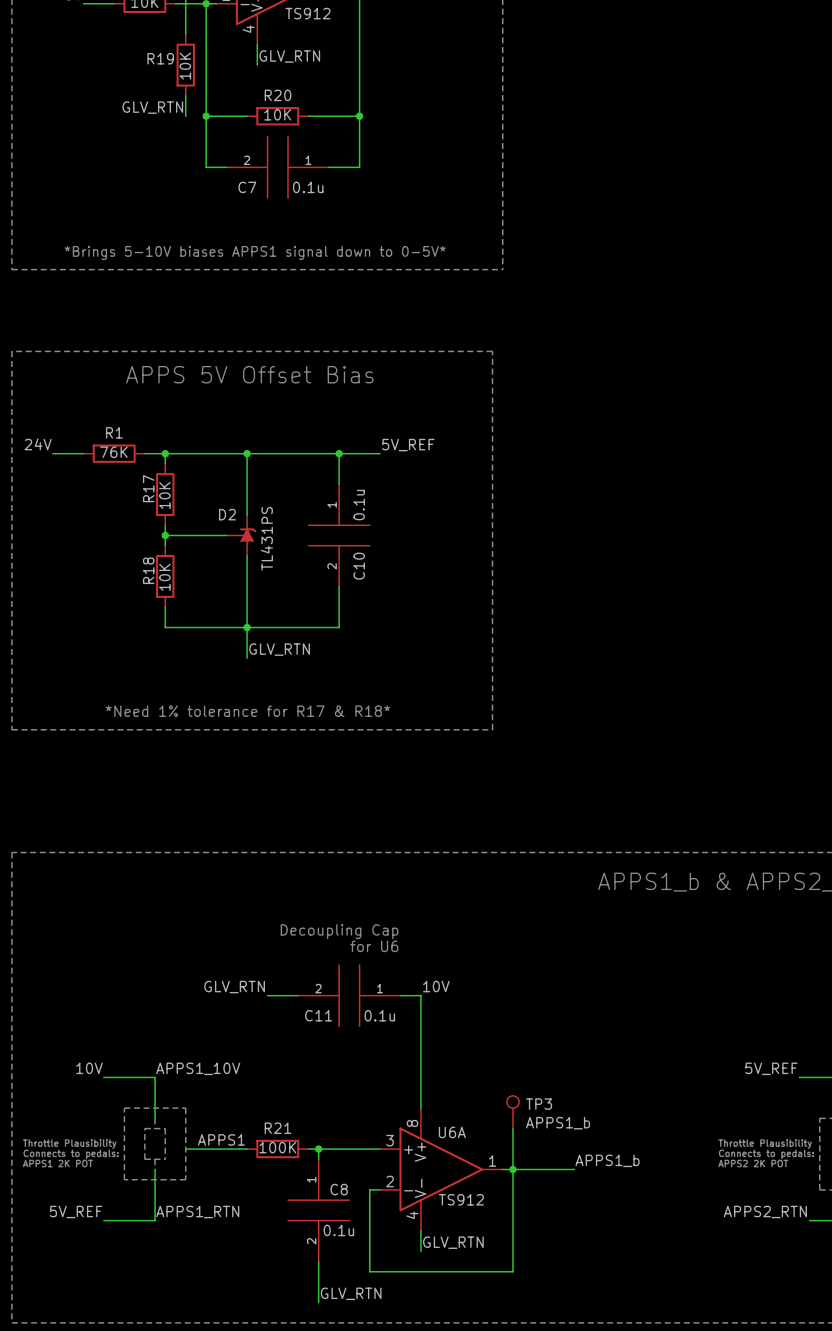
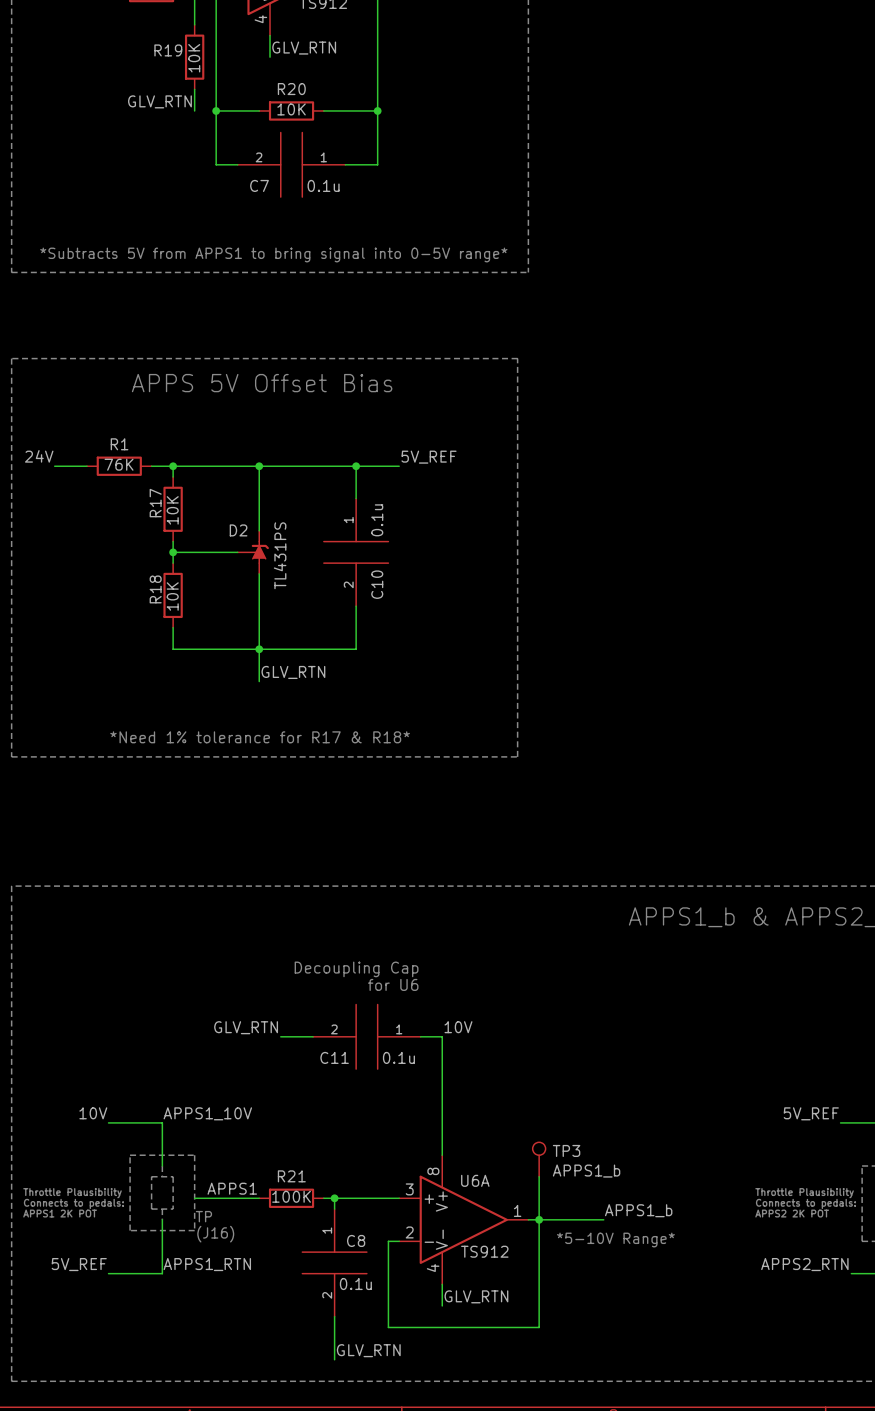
text: *Brings 5-10V biases APPS1 signal down to 0-5V* (255, 253) -> none
text: none -> *Subtracts 5V from APPS1 to bring signal into 0-5V range* (273, 254)
text: none -> TP (203, 1216)
text: none -> (J16) (215, 1234)
text: none -> *5-10V Range* (615, 1240)

